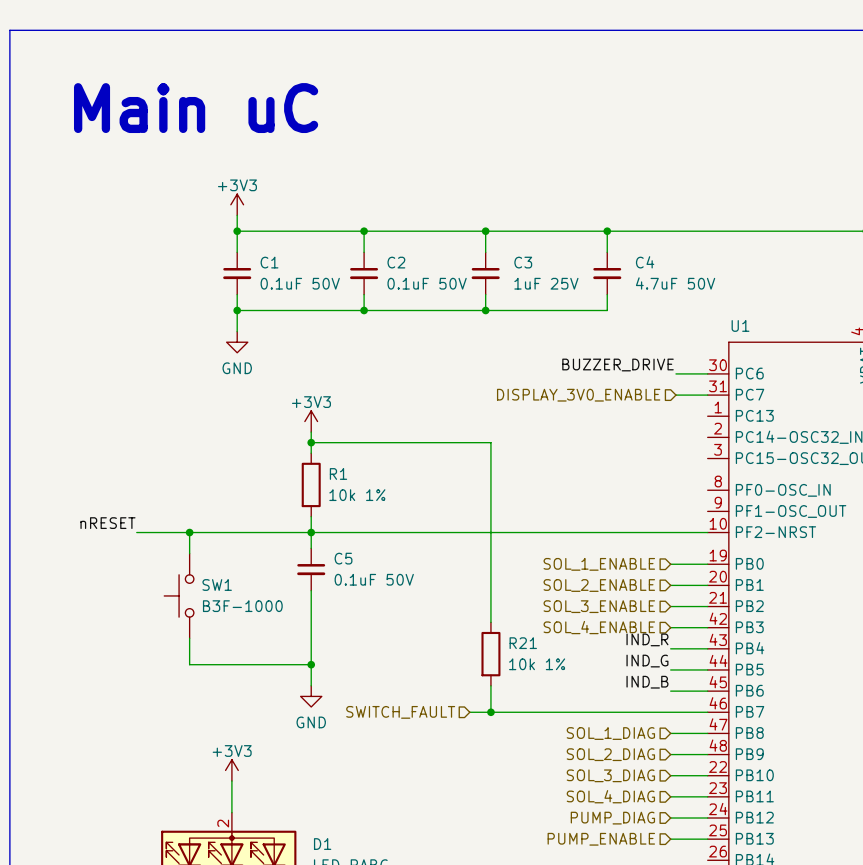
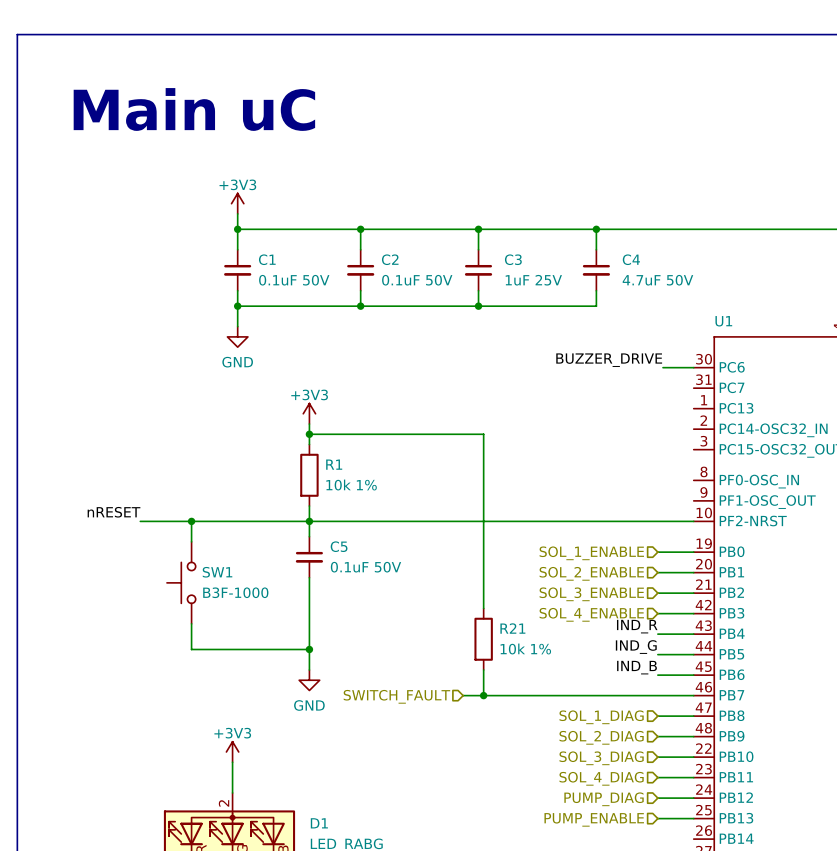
hierarchical label: DISPLAY_3V0_ENABLE (578, 395) -> none
wire: (675, 395) (707, 395) -> none

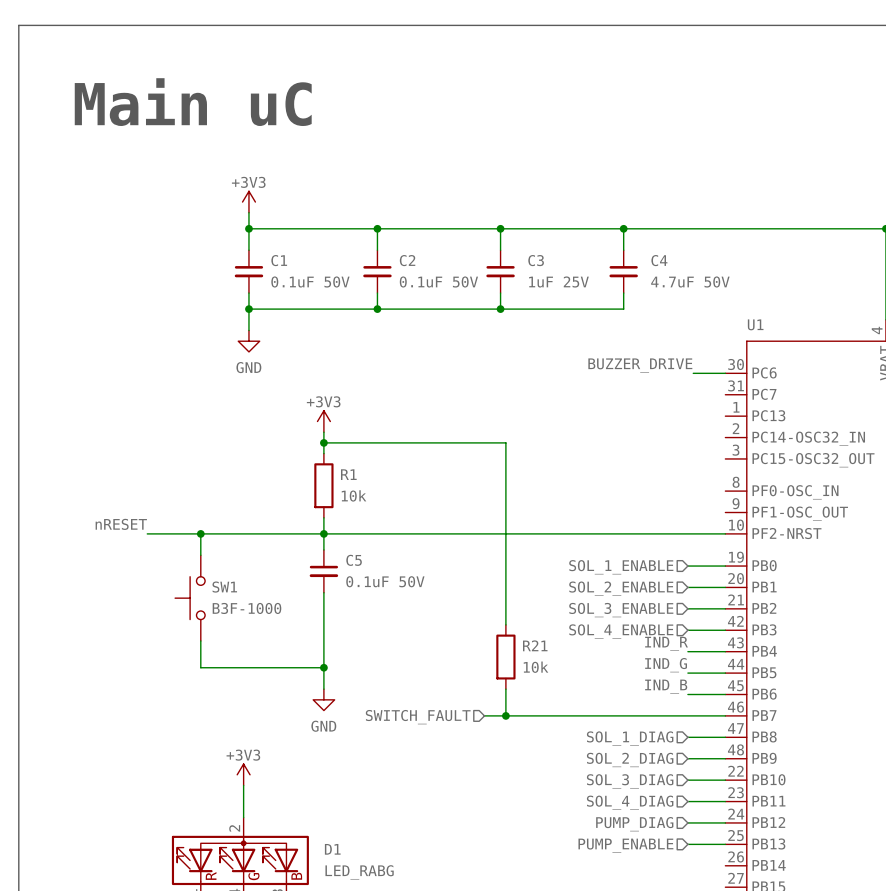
R1 value: 10k 1% (351, 485) -> 10k (354, 495)
R21 value: 10k 1% (525, 649) -> 10k (536, 667)

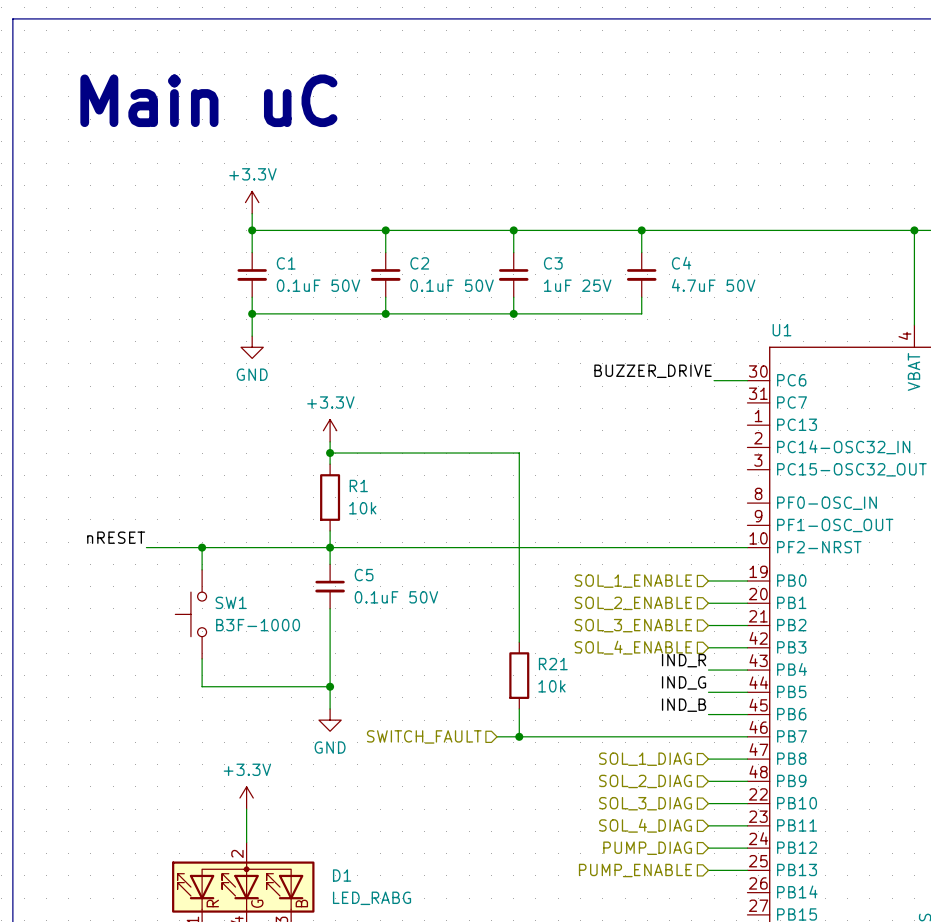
power symbol: +3V3 (248, 202) -> +3.3V (252, 202)
power symbol: +3V3 (323, 421) -> +3.3V (330, 430)
power symbol: +3V3 (243, 774) -> +3.3V (246, 798)

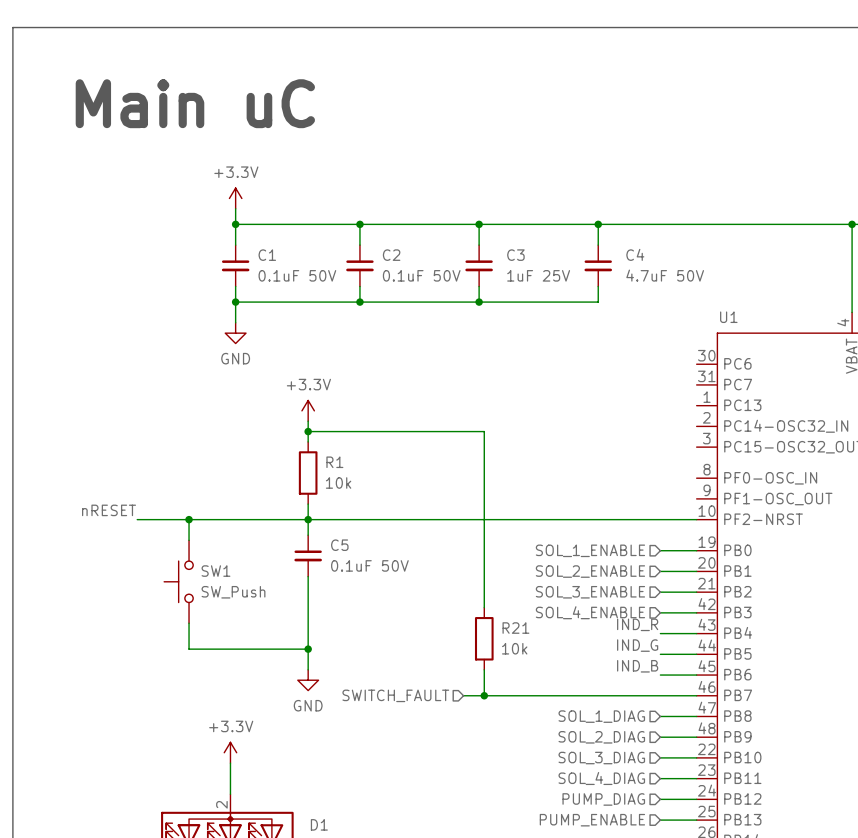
label: BUZZER_DRIVE (653, 371) -> none
wire: (714, 380) (747, 380) -> none
SW1 value: B3F-1000 (258, 625) -> SW_Push (233, 592)

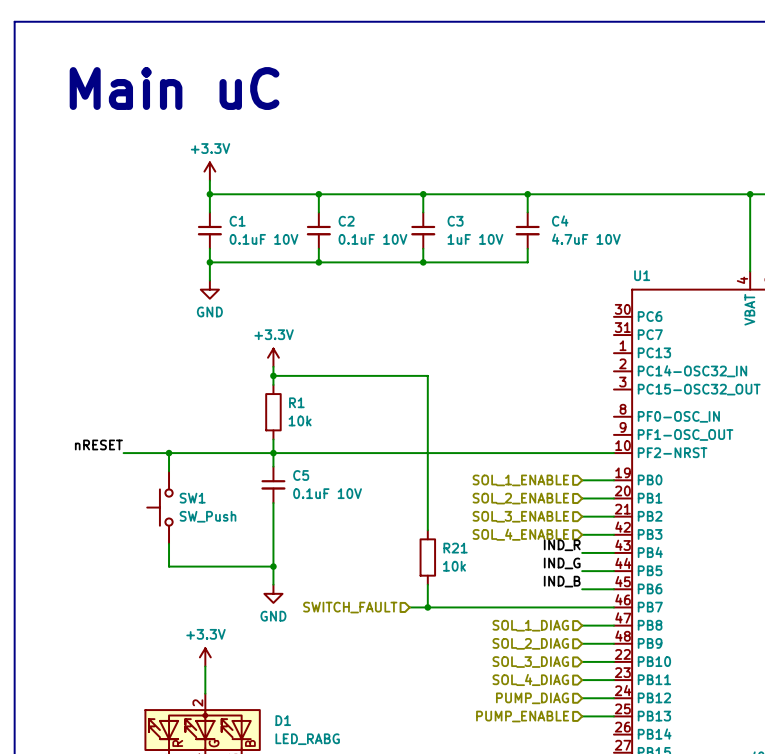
C1 value: 0.1uF 50V (297, 275) -> 0.1uF 10V (264, 239)
C2 value: 0.1uF 50V (421, 275) -> 0.1uF 10V (372, 239)
C3 value: 1uF 25V (538, 275) -> 1uF 10V (475, 239)
C4 value: 4.7uF 50V (665, 275) -> 4.7uF 10V (586, 239)
C5 value: 0.1uF 50V (369, 565) -> 0.1uF 10V (327, 493)

